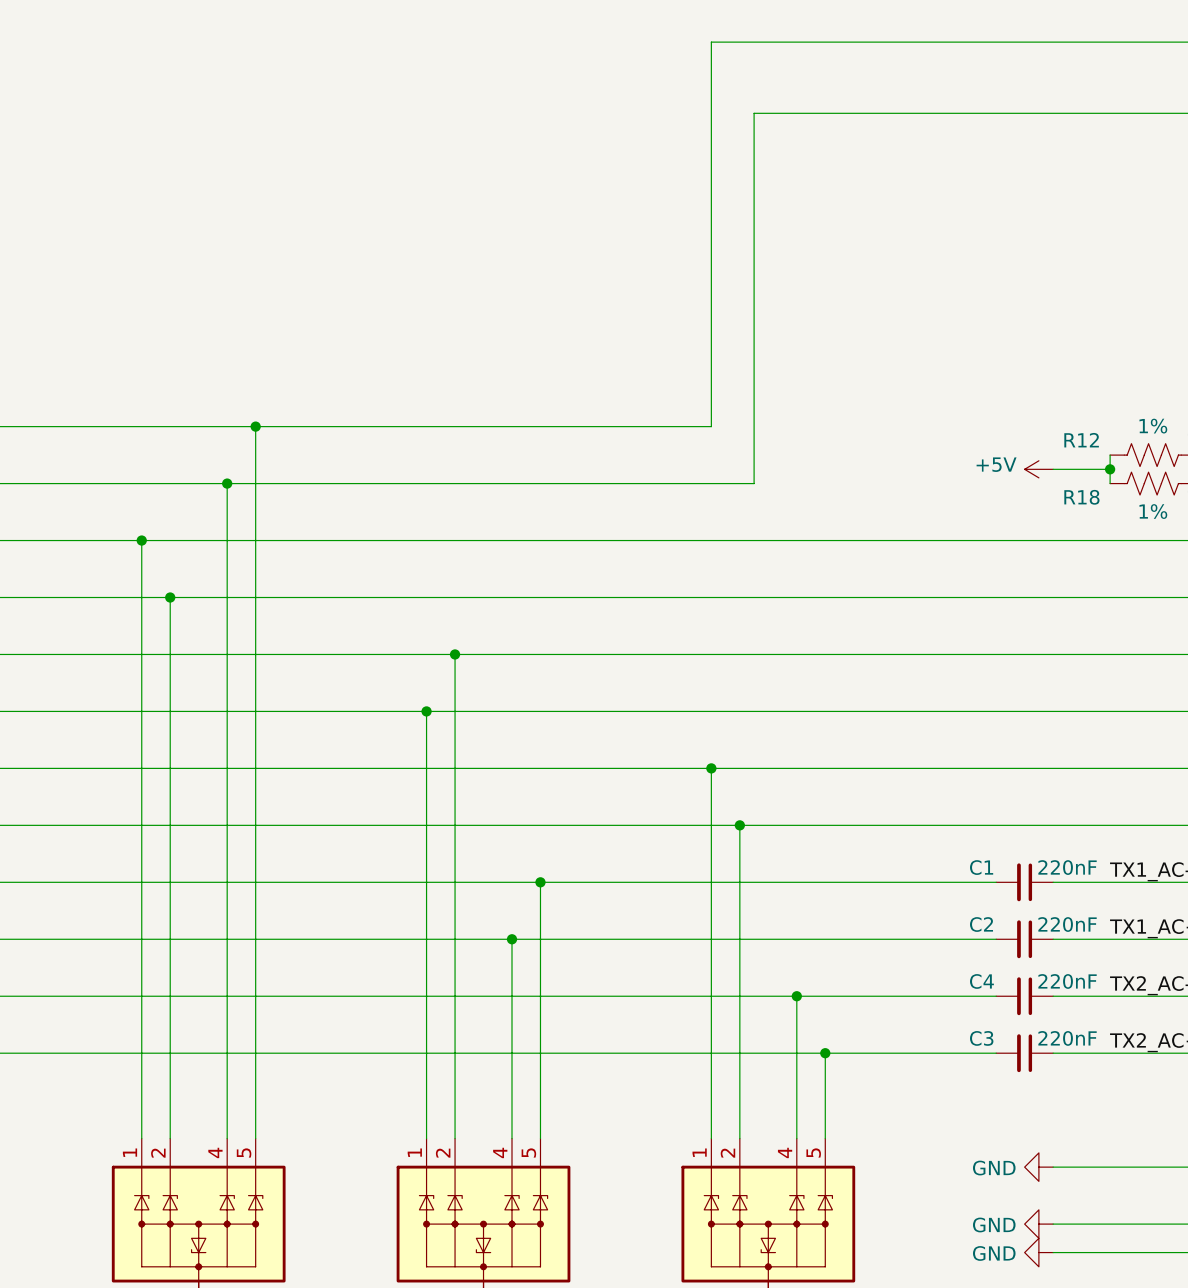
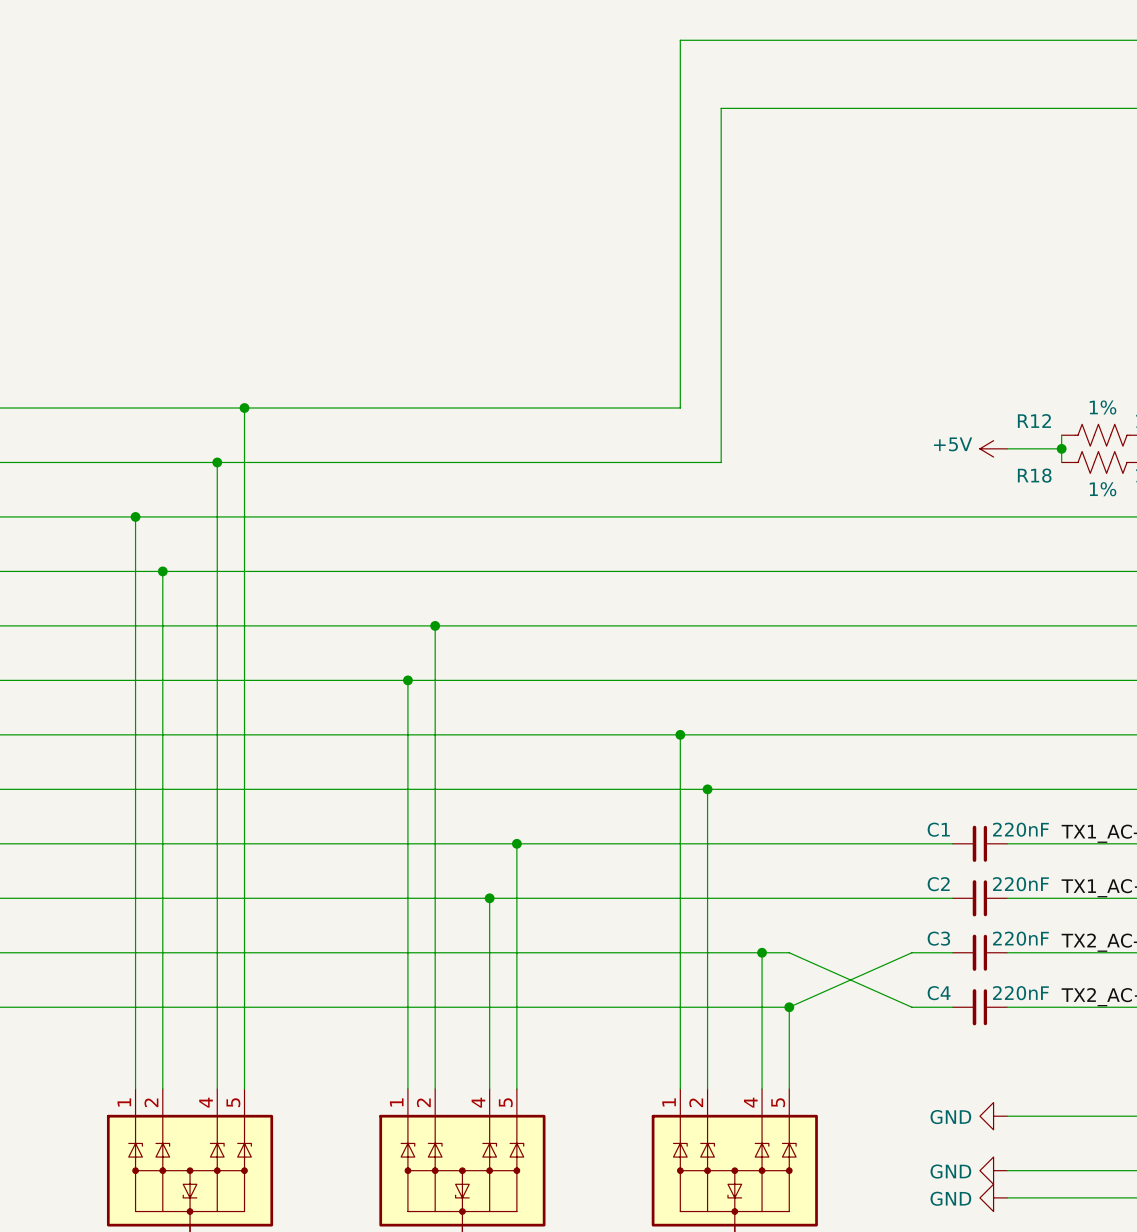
C4 name: C4 (981, 981) -> C3 (938, 938)
wire: (825, 996) (953, 996) -> (789, 952) (911, 1007)
C3 name: C3 (981, 1038) -> C4 (939, 993)
wire: (825, 1053) (953, 1053) -> (789, 1007) (911, 952)

